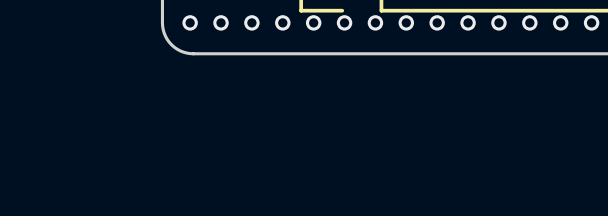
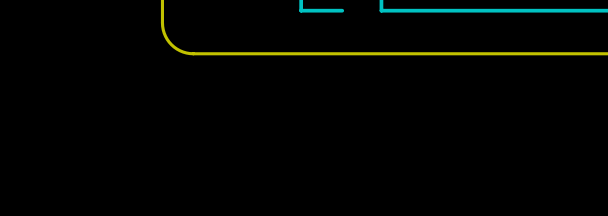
via: (190, 22) -> none
via: (221, 22) -> none
via: (251, 22) -> none
via: (282, 22) -> none
via: (313, 22) -> none
via: (344, 22) -> none
via: (375, 22) -> none
via: (406, 22) -> none
via: (437, 22) -> none
via: (468, 22) -> none
via: (498, 22) -> none
via: (529, 22) -> none
via: (560, 22) -> none
via: (591, 22) -> none

